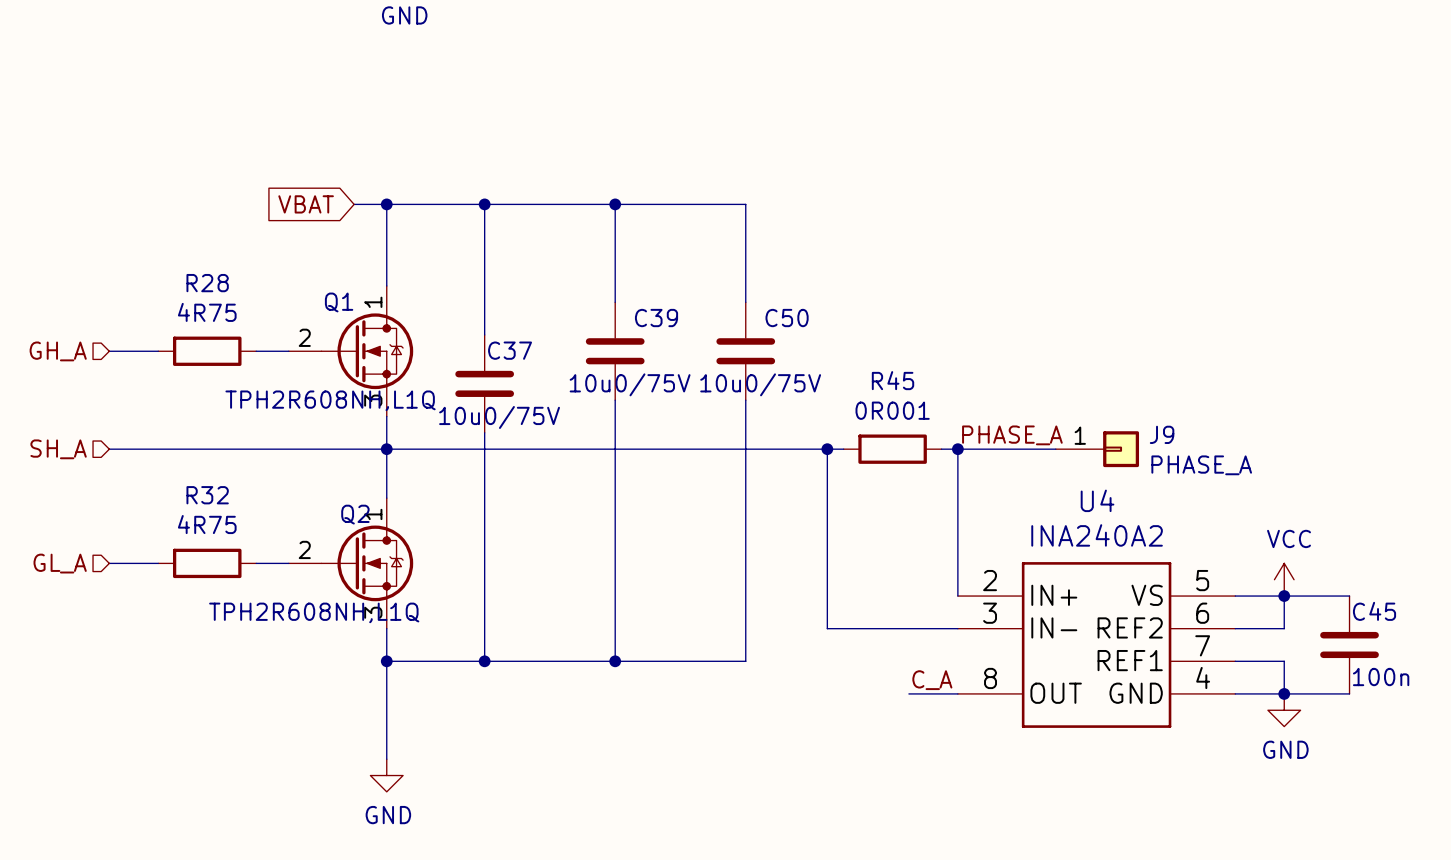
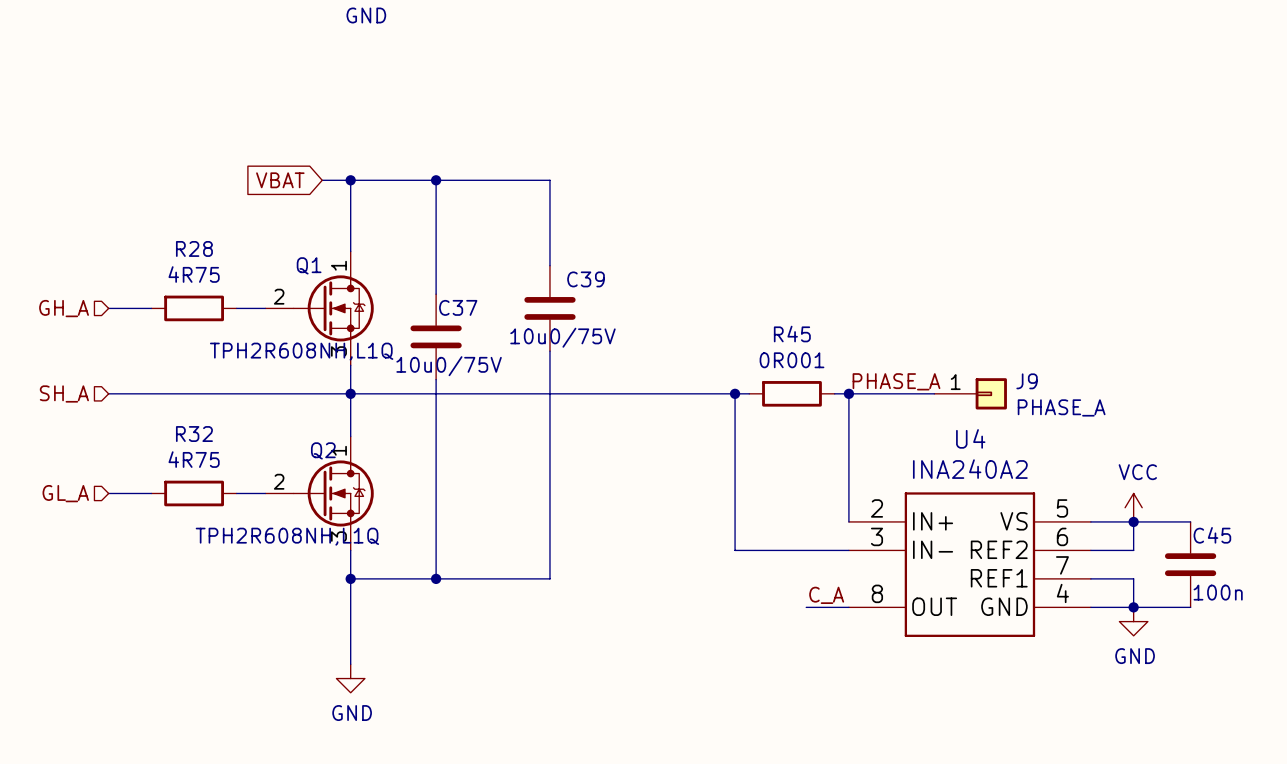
wire: (615, 204) (745, 204) (745, 302) -> none
junction: (615, 204) -> none
C50: 10u0/75V (745, 351) -> none
wire: (745, 400) (745, 661) (615, 661) -> none
junction: (615, 661) -> none

